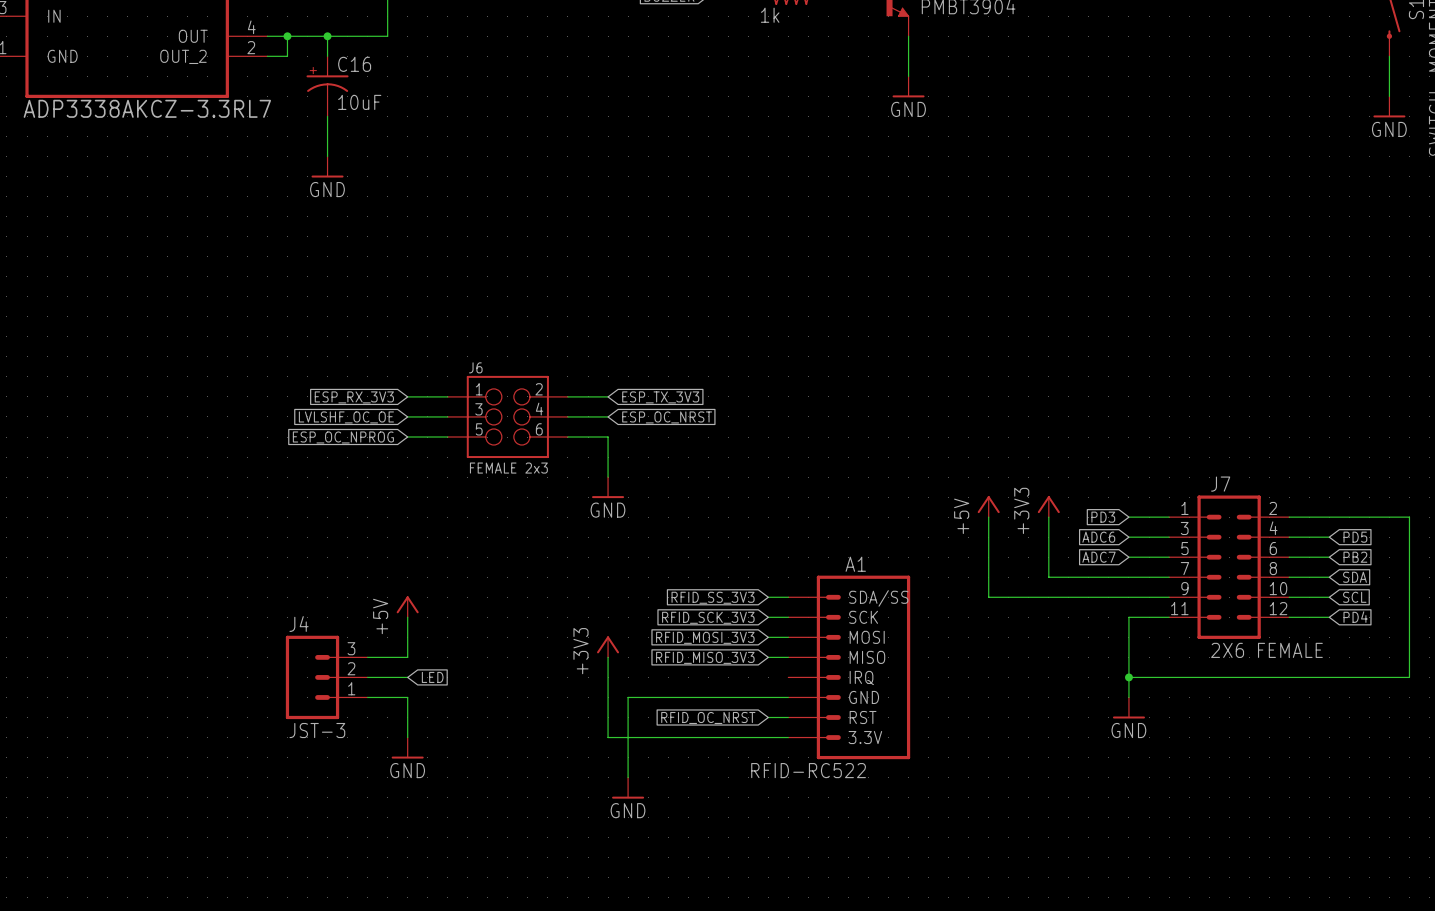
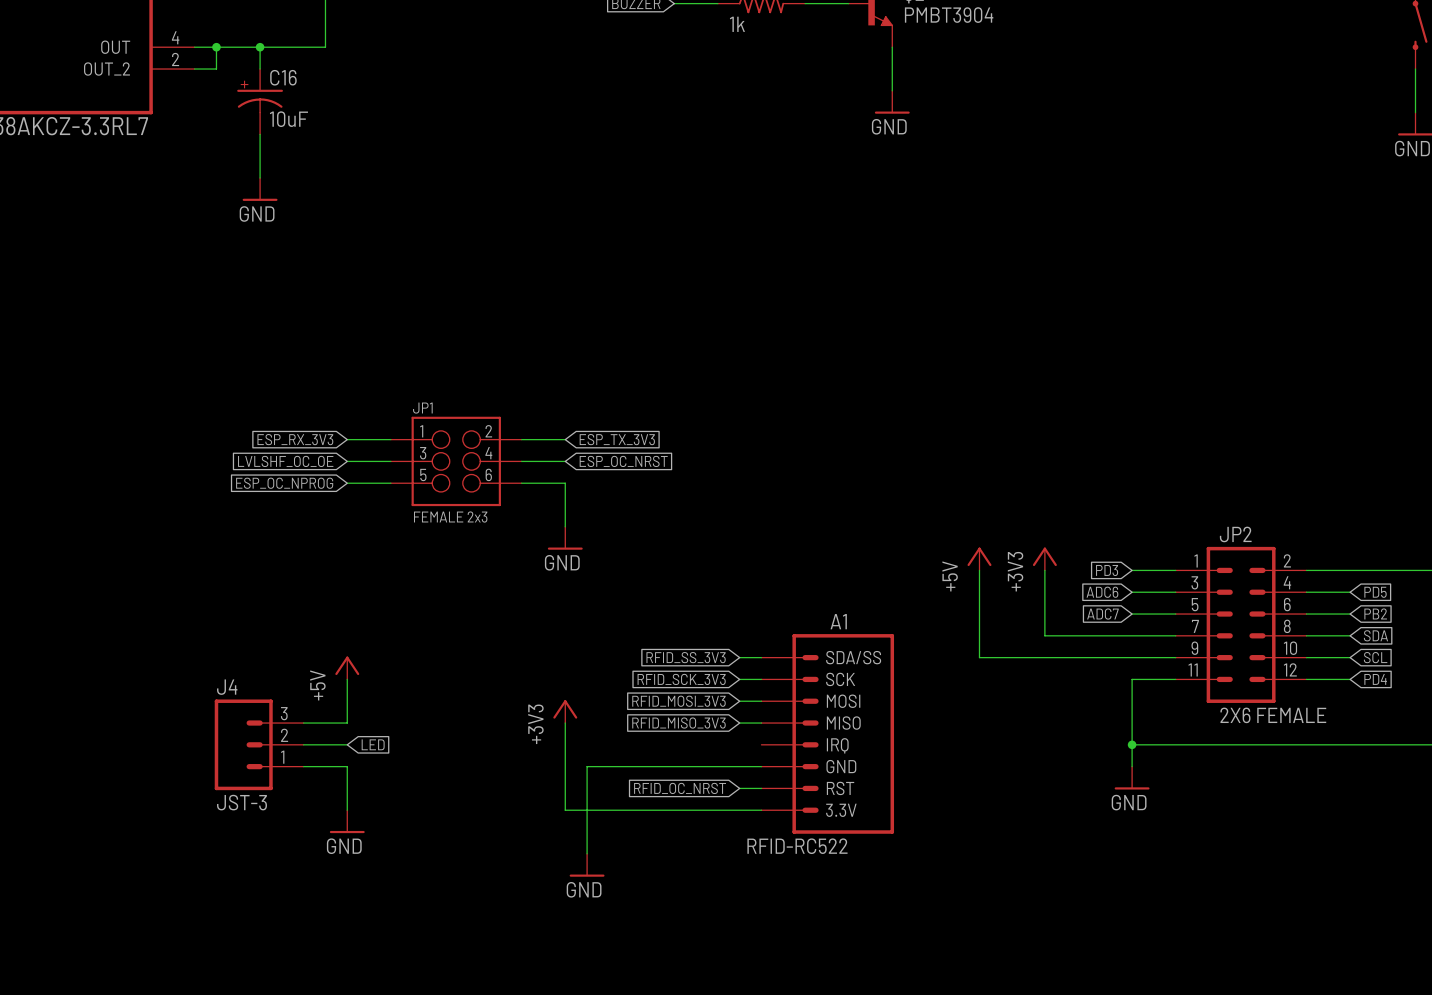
J6 name: J6 (475, 367) -> JP1 (422, 408)
J7 name: J7 (1220, 484) -> JP2 (1235, 534)

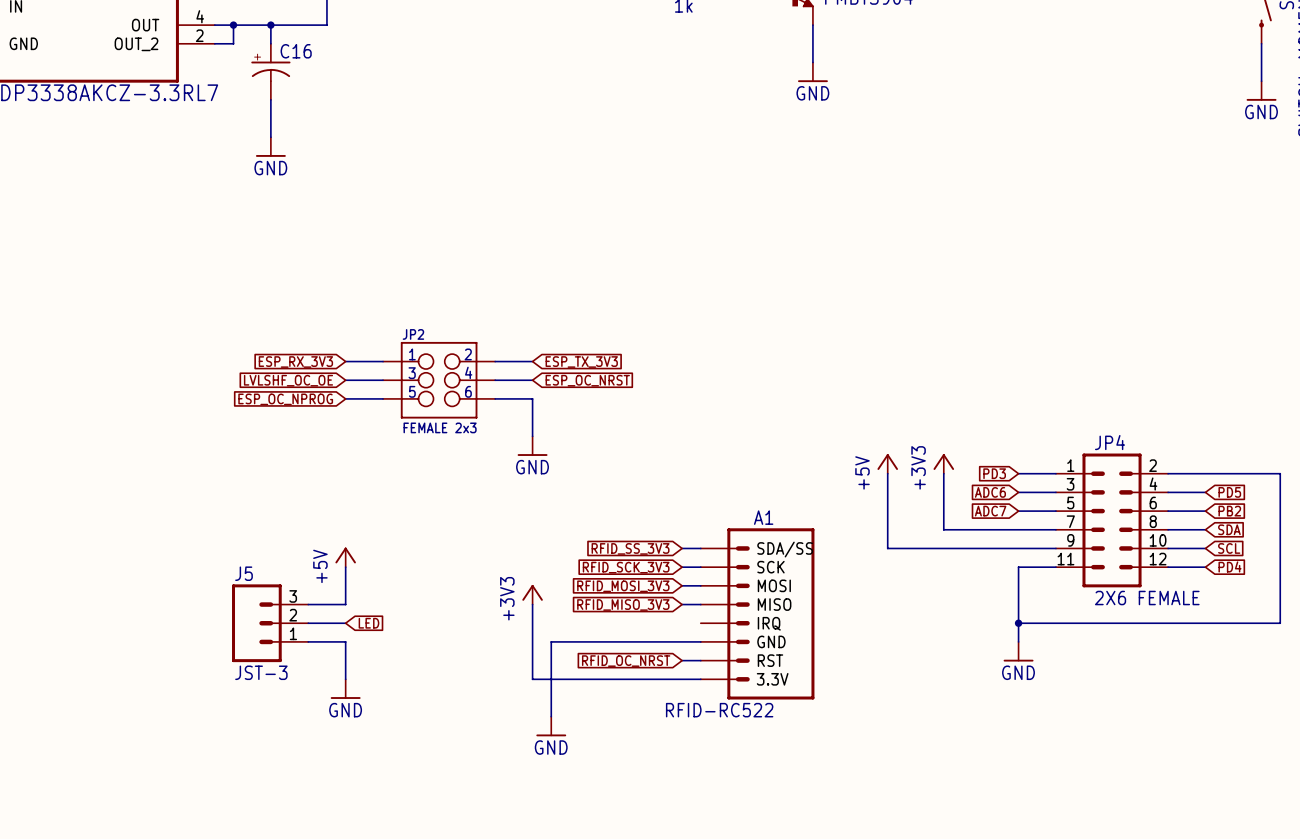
C16 value: 10uF (288, 119) -> none
JP1 name: JP1 (422, 408) -> JP2 (413, 334)
JP2 name: JP2 (1235, 534) -> JP4 (1110, 442)
J4 name: J4 (227, 687) -> J5 (244, 573)

